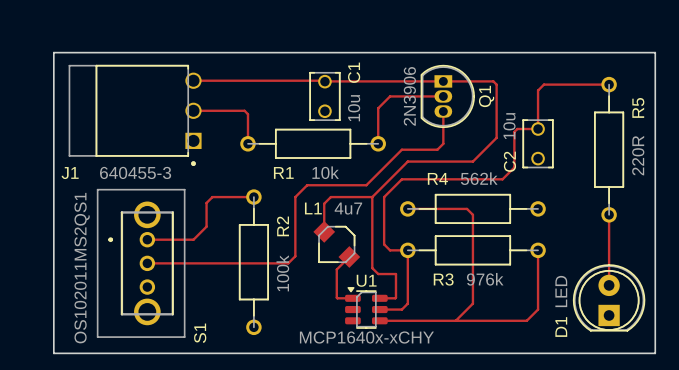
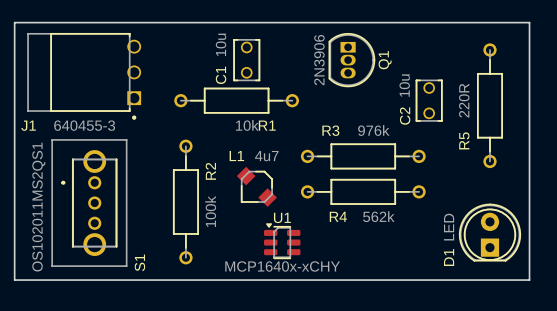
C1 name position: C1 (354, 72) -> C1 (221, 75)
top track: (193, 80) (493, 81) (496, 84) (496, 137) (472, 161) (407, 161) (372, 197) -> none
top track: (609, 84) (543, 84) (538, 90) (538, 129) (517, 129) (514, 131) (514, 167) (502, 179) (401, 179) (384, 197) (384, 244) (390, 250) (407, 250) (407, 303) (401, 309) (379, 309) -> none
top track: (443, 96) (390, 96) (378, 108) (378, 143) -> none
R5 name position: R5 (638, 107) -> R5 (464, 140)
C1 value position: 10u (354, 108) -> 10u (221, 44)
top track: (193, 110) (244, 110) (247, 114) (247, 143) -> none
top track: (443, 111) (443, 143) (437, 149) (401, 149) (366, 185) (307, 185) (295, 197) (295, 256) (288, 263) (147, 263) -> none
R5 value position: 220R (638, 155) -> 220R (464, 100)
R1 name position: R1 (283, 172) -> R1 (267, 125)
R4 name position: R4 (437, 178) -> R4 (338, 216)
R4 value position: 562k (479, 178) -> 562k (378, 216)
top track: (253, 197) (212, 197) (206, 203) (206, 226) (193, 239) (147, 239) -> none
top track: (372, 197) (330, 197) (324, 203) (324, 231) -> none
top track: (372, 197) (372, 268) (378, 274) (395, 274) (395, 297) (379, 298) -> none
top track: (407, 208) (467, 208) (472, 214) (472, 303) (455, 320) -> none
R4 position: (472, 208) -> (363, 191)
top track: (609, 214) (609, 285) -> none
R3 position: (472, 250) -> (363, 156)
top track: (538, 250) (538, 309) (526, 320) (379, 320) -> none
top track: (349, 256) (336, 269) (336, 297) (352, 298) -> none
R3 name position: R3 (443, 279) -> R3 (330, 130)
R3 value position: 976k (485, 279) -> 976k (373, 130)

